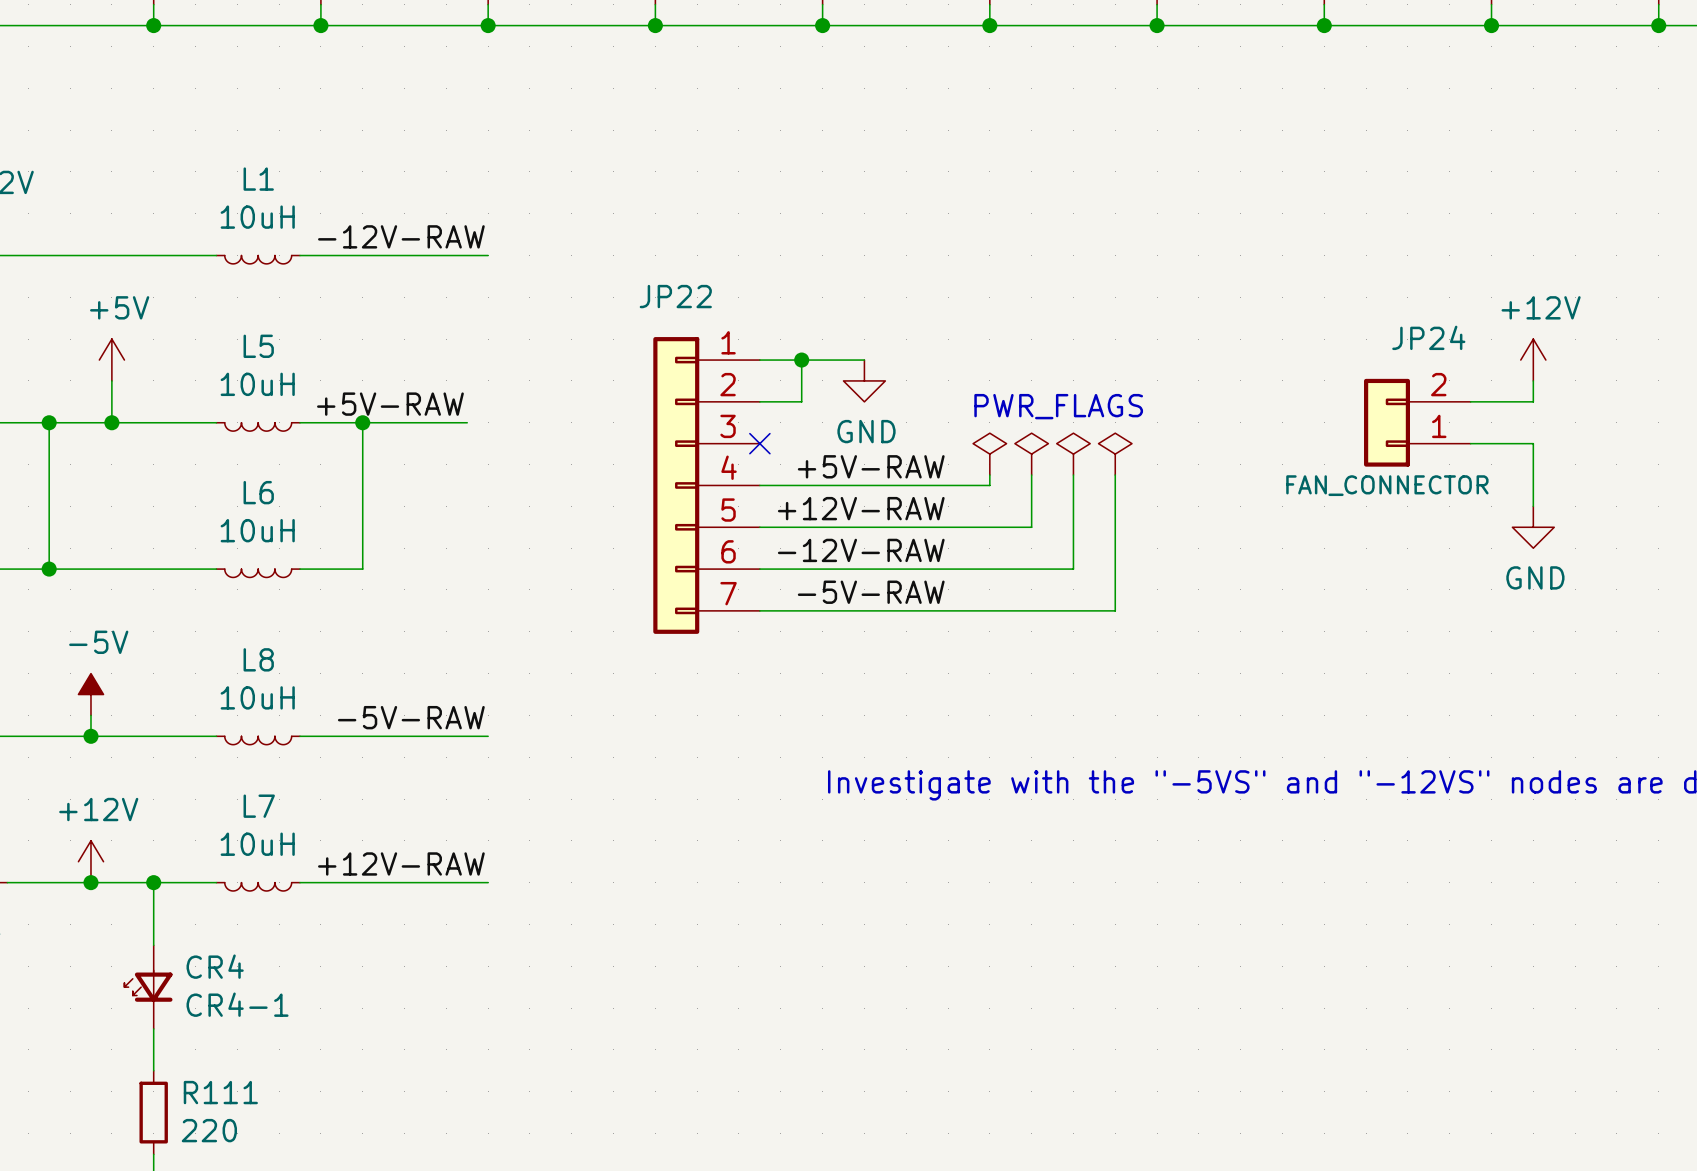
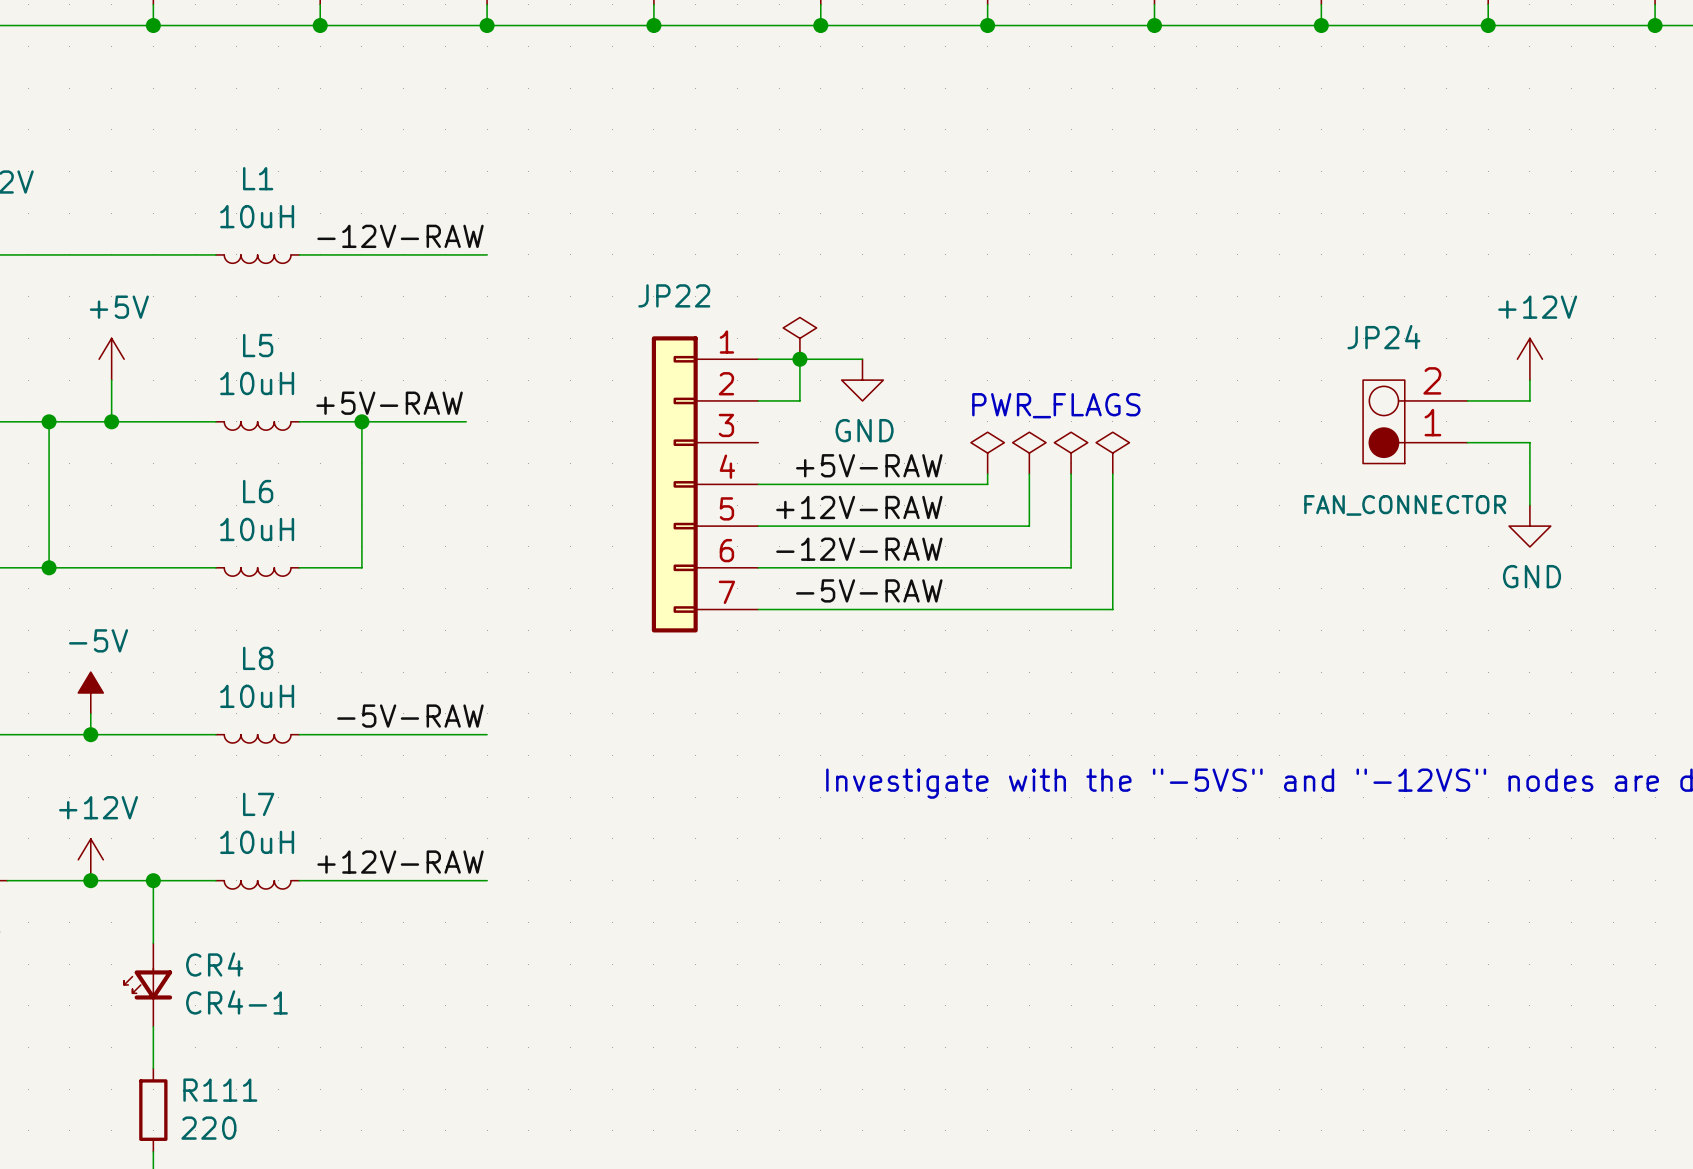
JP24 name position: JP24 (1428, 337) -> JP24 (1383, 337)
power symbol: none -> (799, 338)
JP24 symbol: [1364, 378, 1471, 467] -> [1363, 380, 1468, 464]
no-connect mark: (759, 443) -> none

